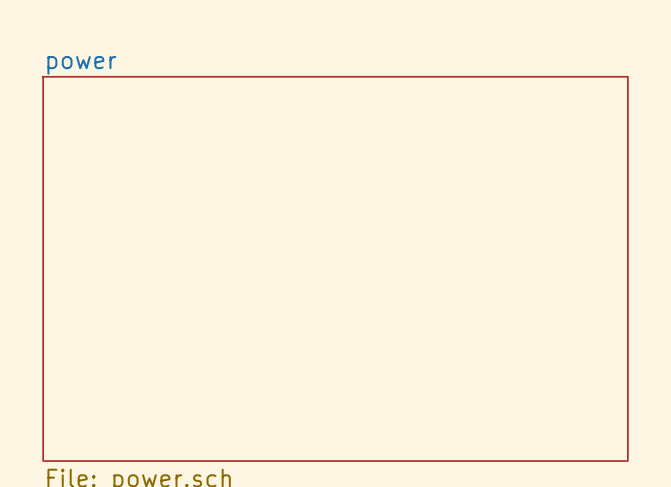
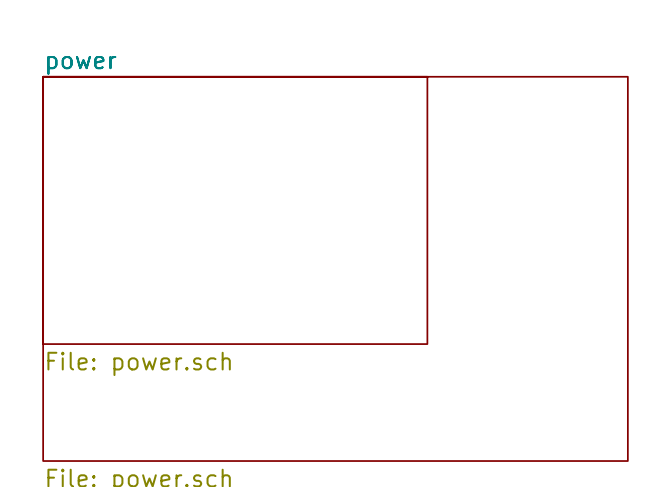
sheet power: none -> File: power.sch (235, 210)

